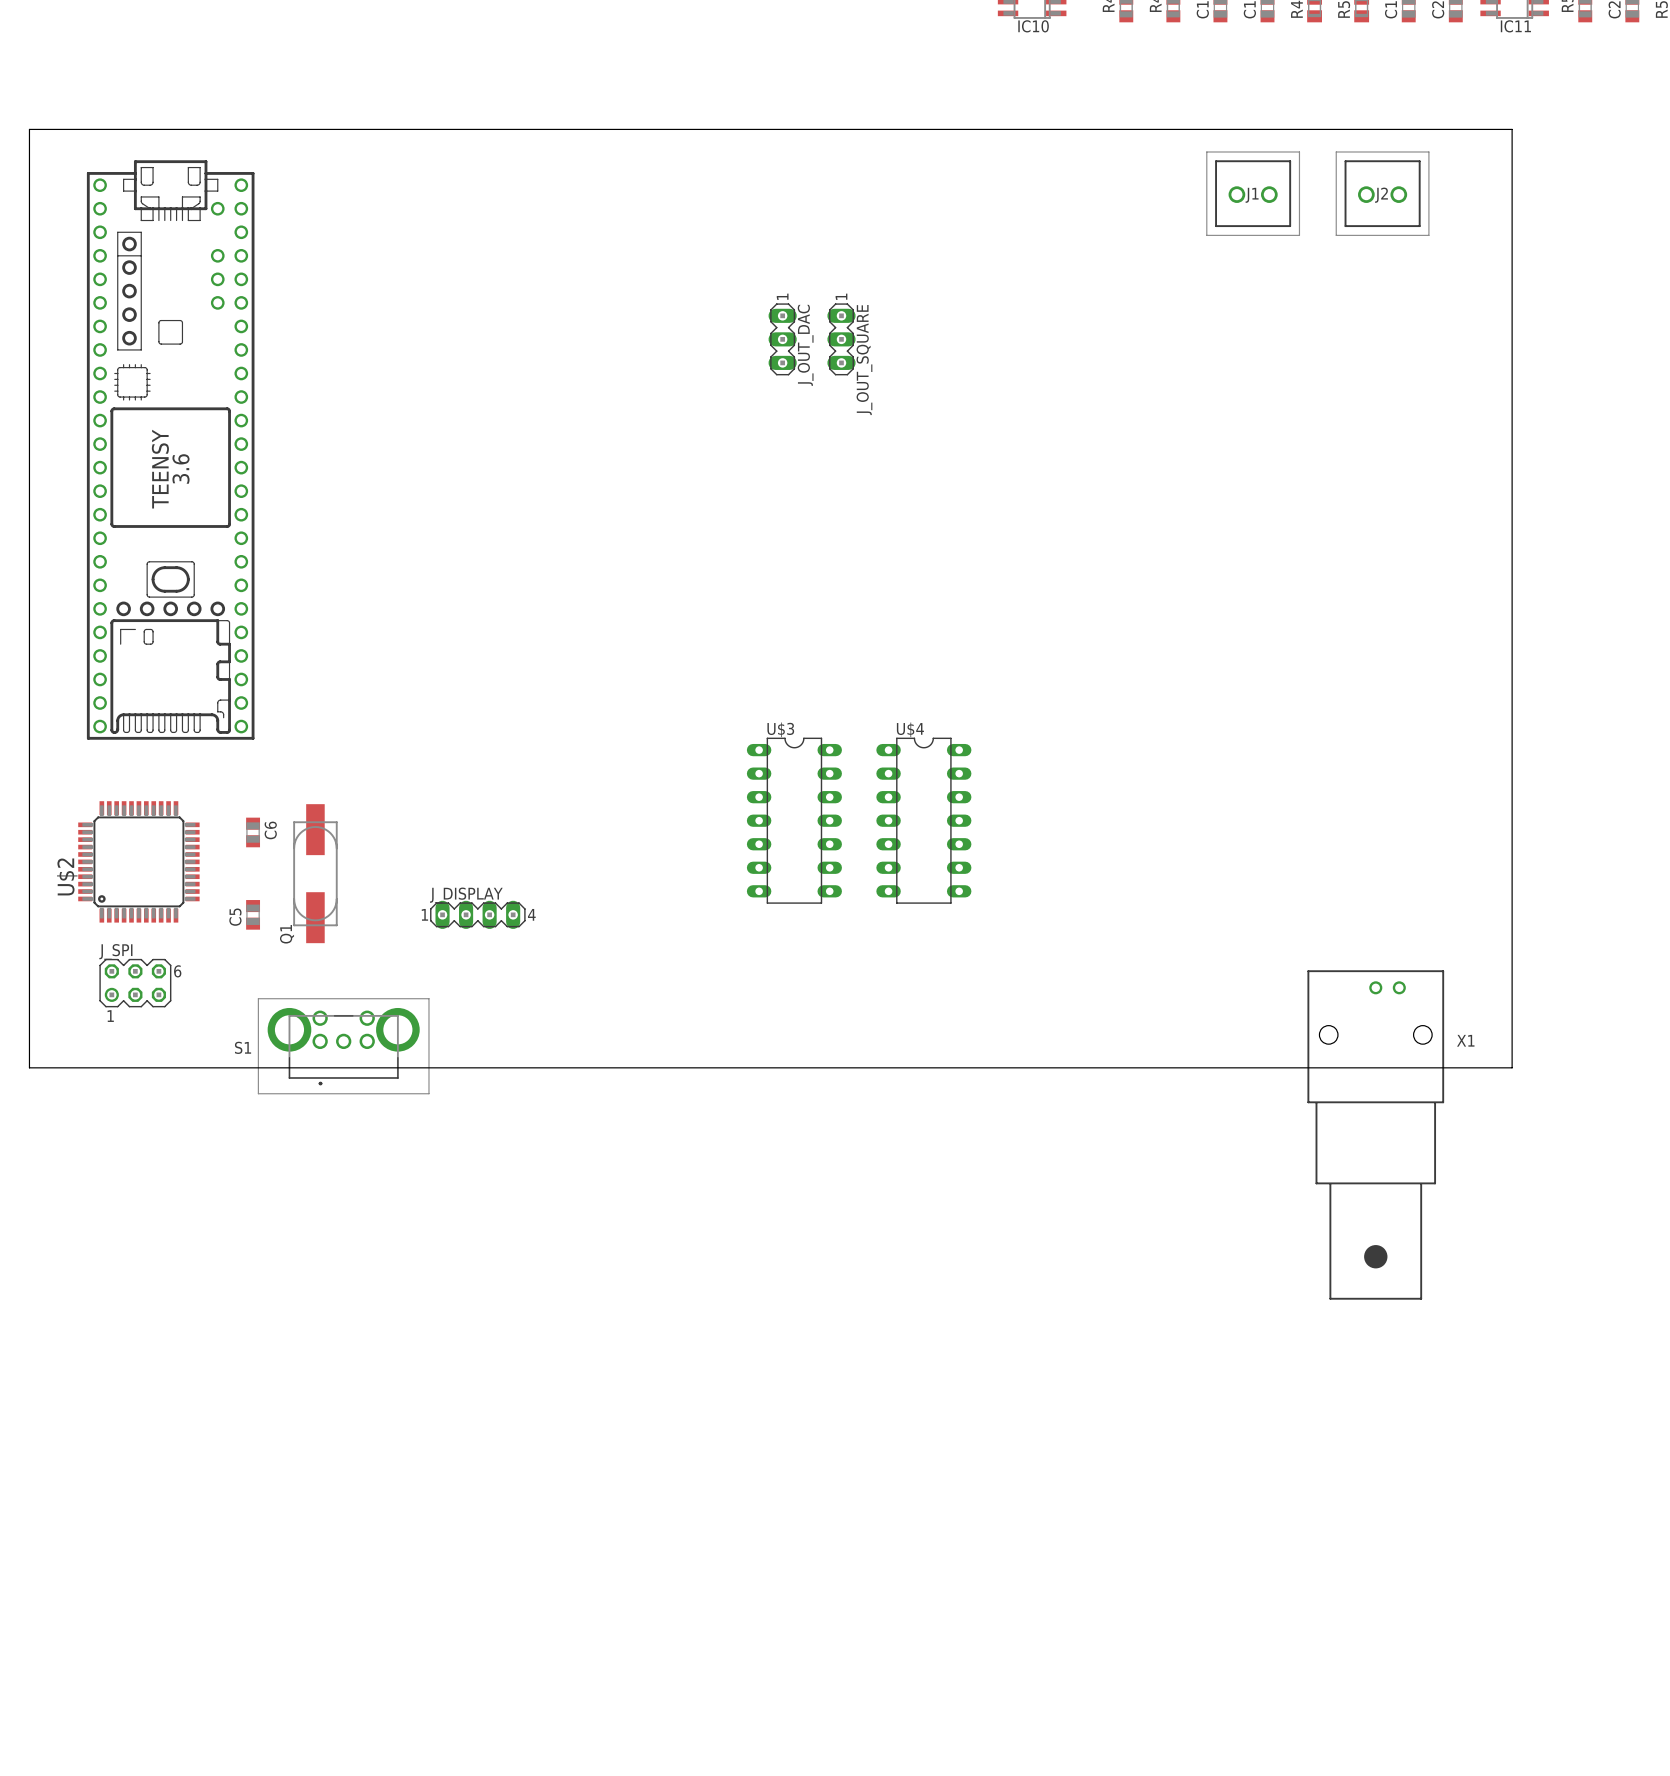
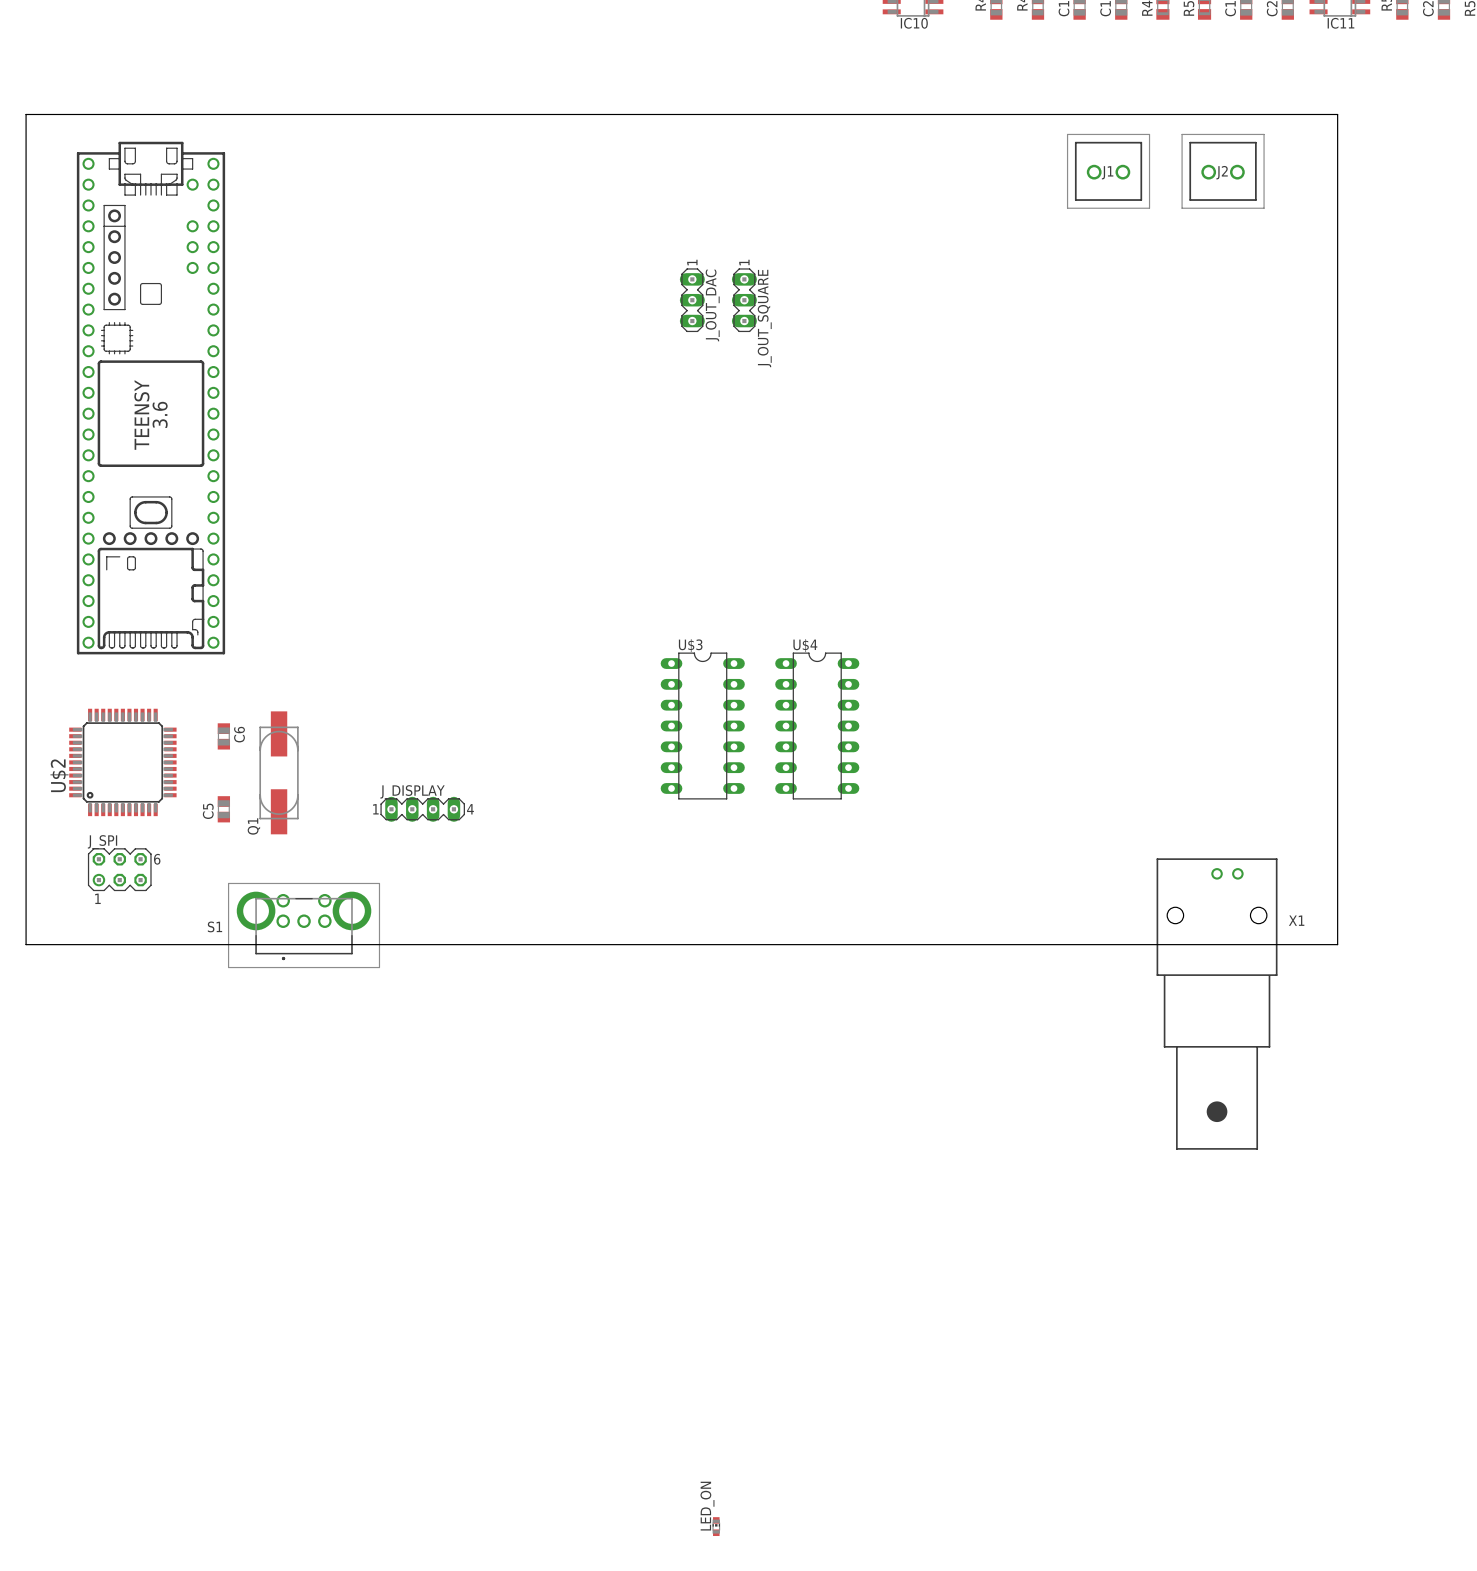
LED_ON: none -> (716, 1526)

